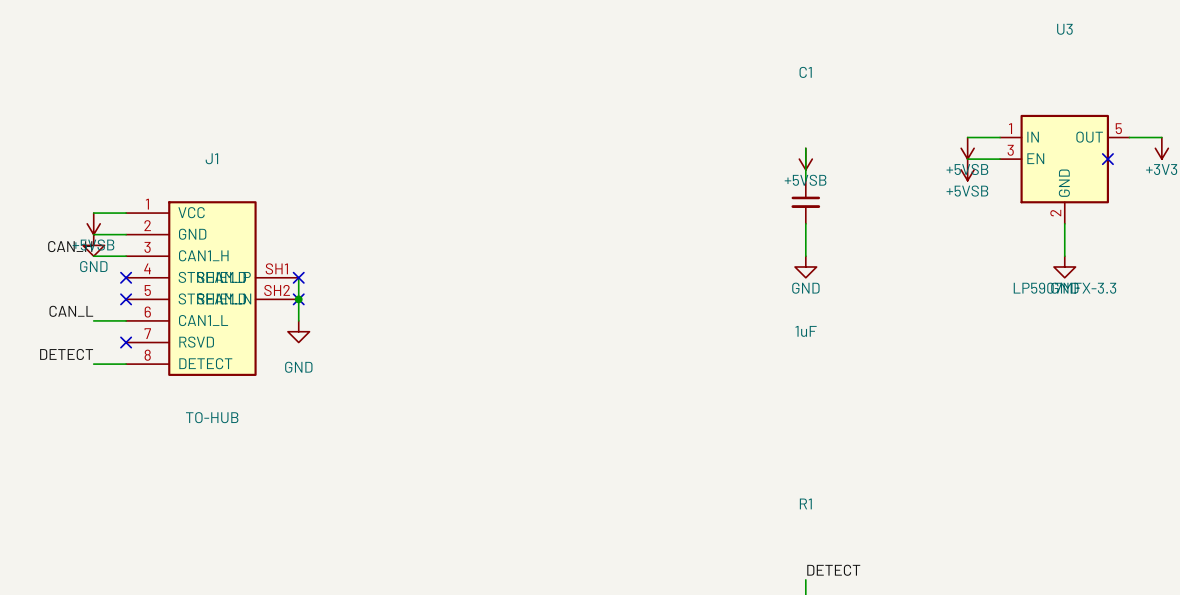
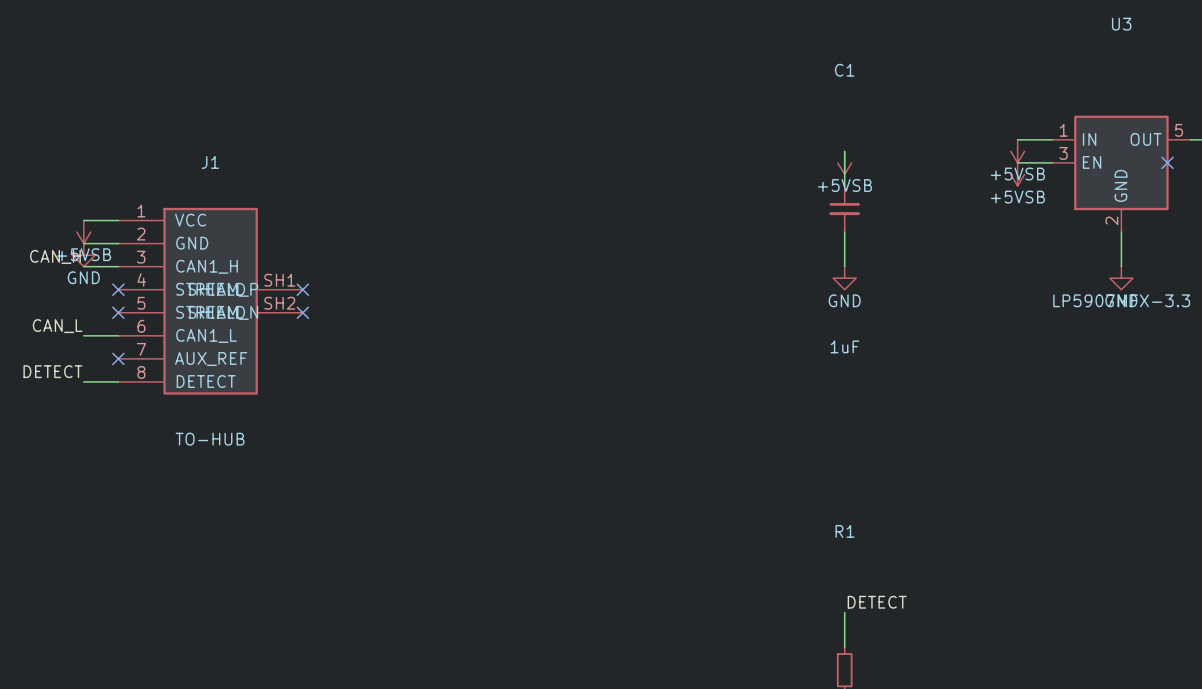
wire: (298, 277) (298, 320) -> none
junction: (298, 299) -> none
power symbol: GND (298, 331) -> none
J1 pin name: RSVD (196, 342) -> AUX_REF (211, 359)

